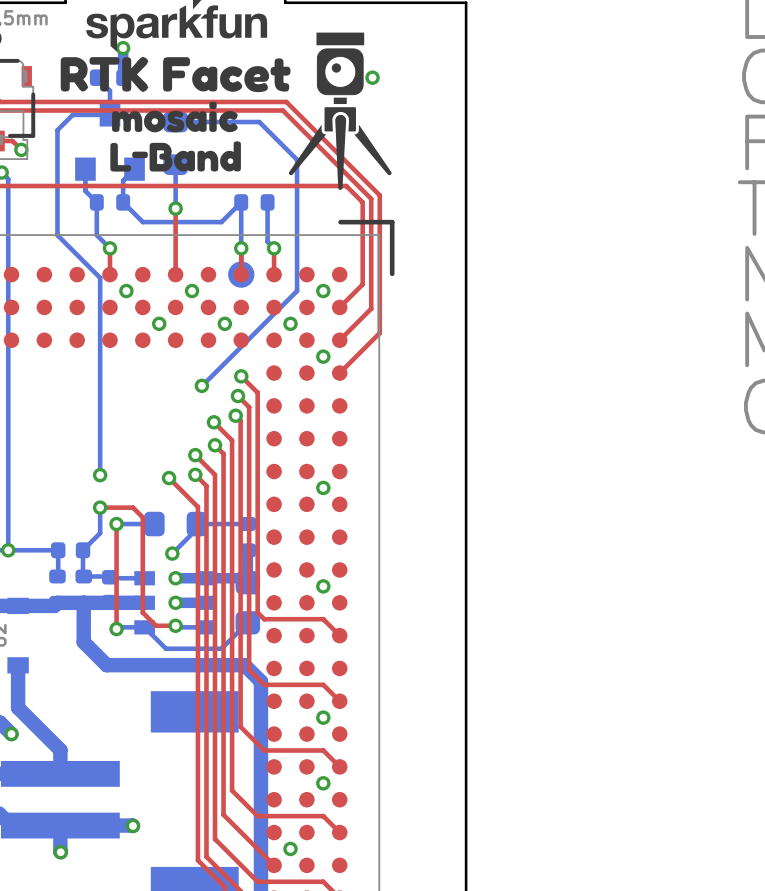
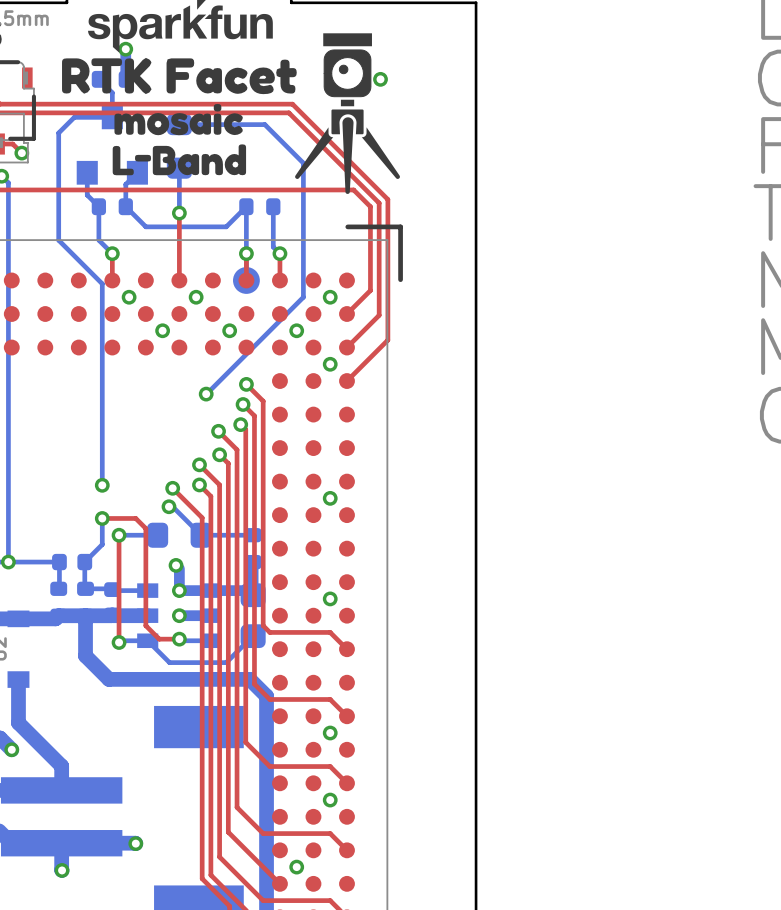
via: none -> (168, 506)
bottom track: (196, 524) (196, 528) (172, 553) -> (201, 535) (172, 506) (168, 506)
bottom track: none -> (179, 568) (179, 590)

